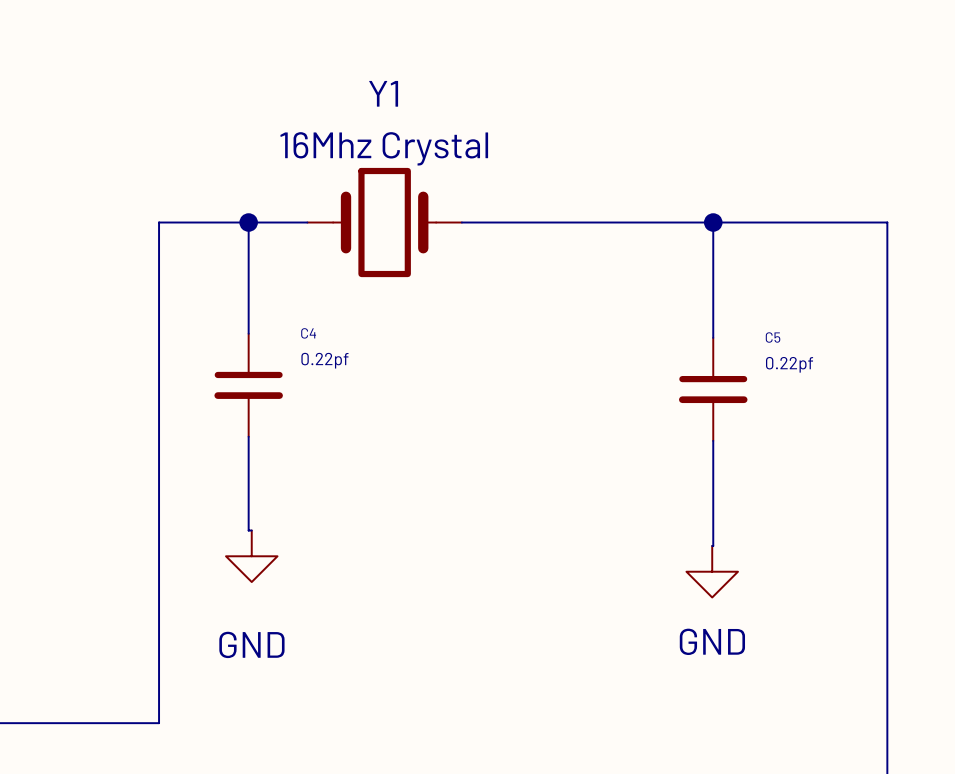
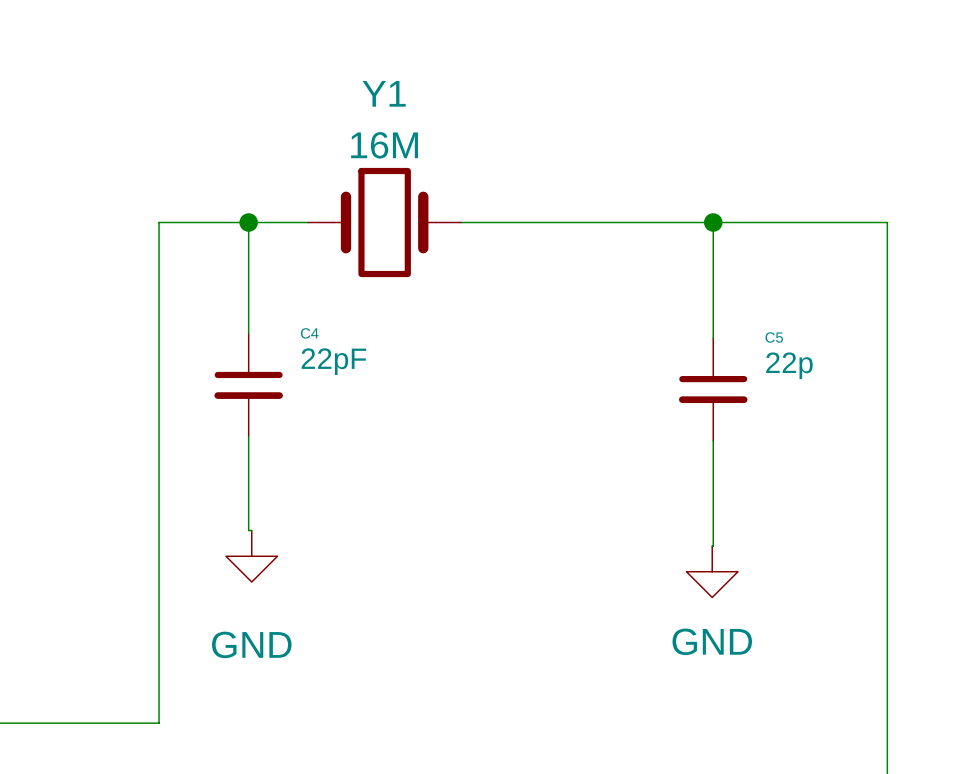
Y1 value: 16Mhz Crystal (384, 148) -> 16M (384, 145)
C4 value: 0.22pf (324, 360) -> 22pF (333, 361)
C5 value: 0.22pf (789, 364) -> 22p (789, 365)

